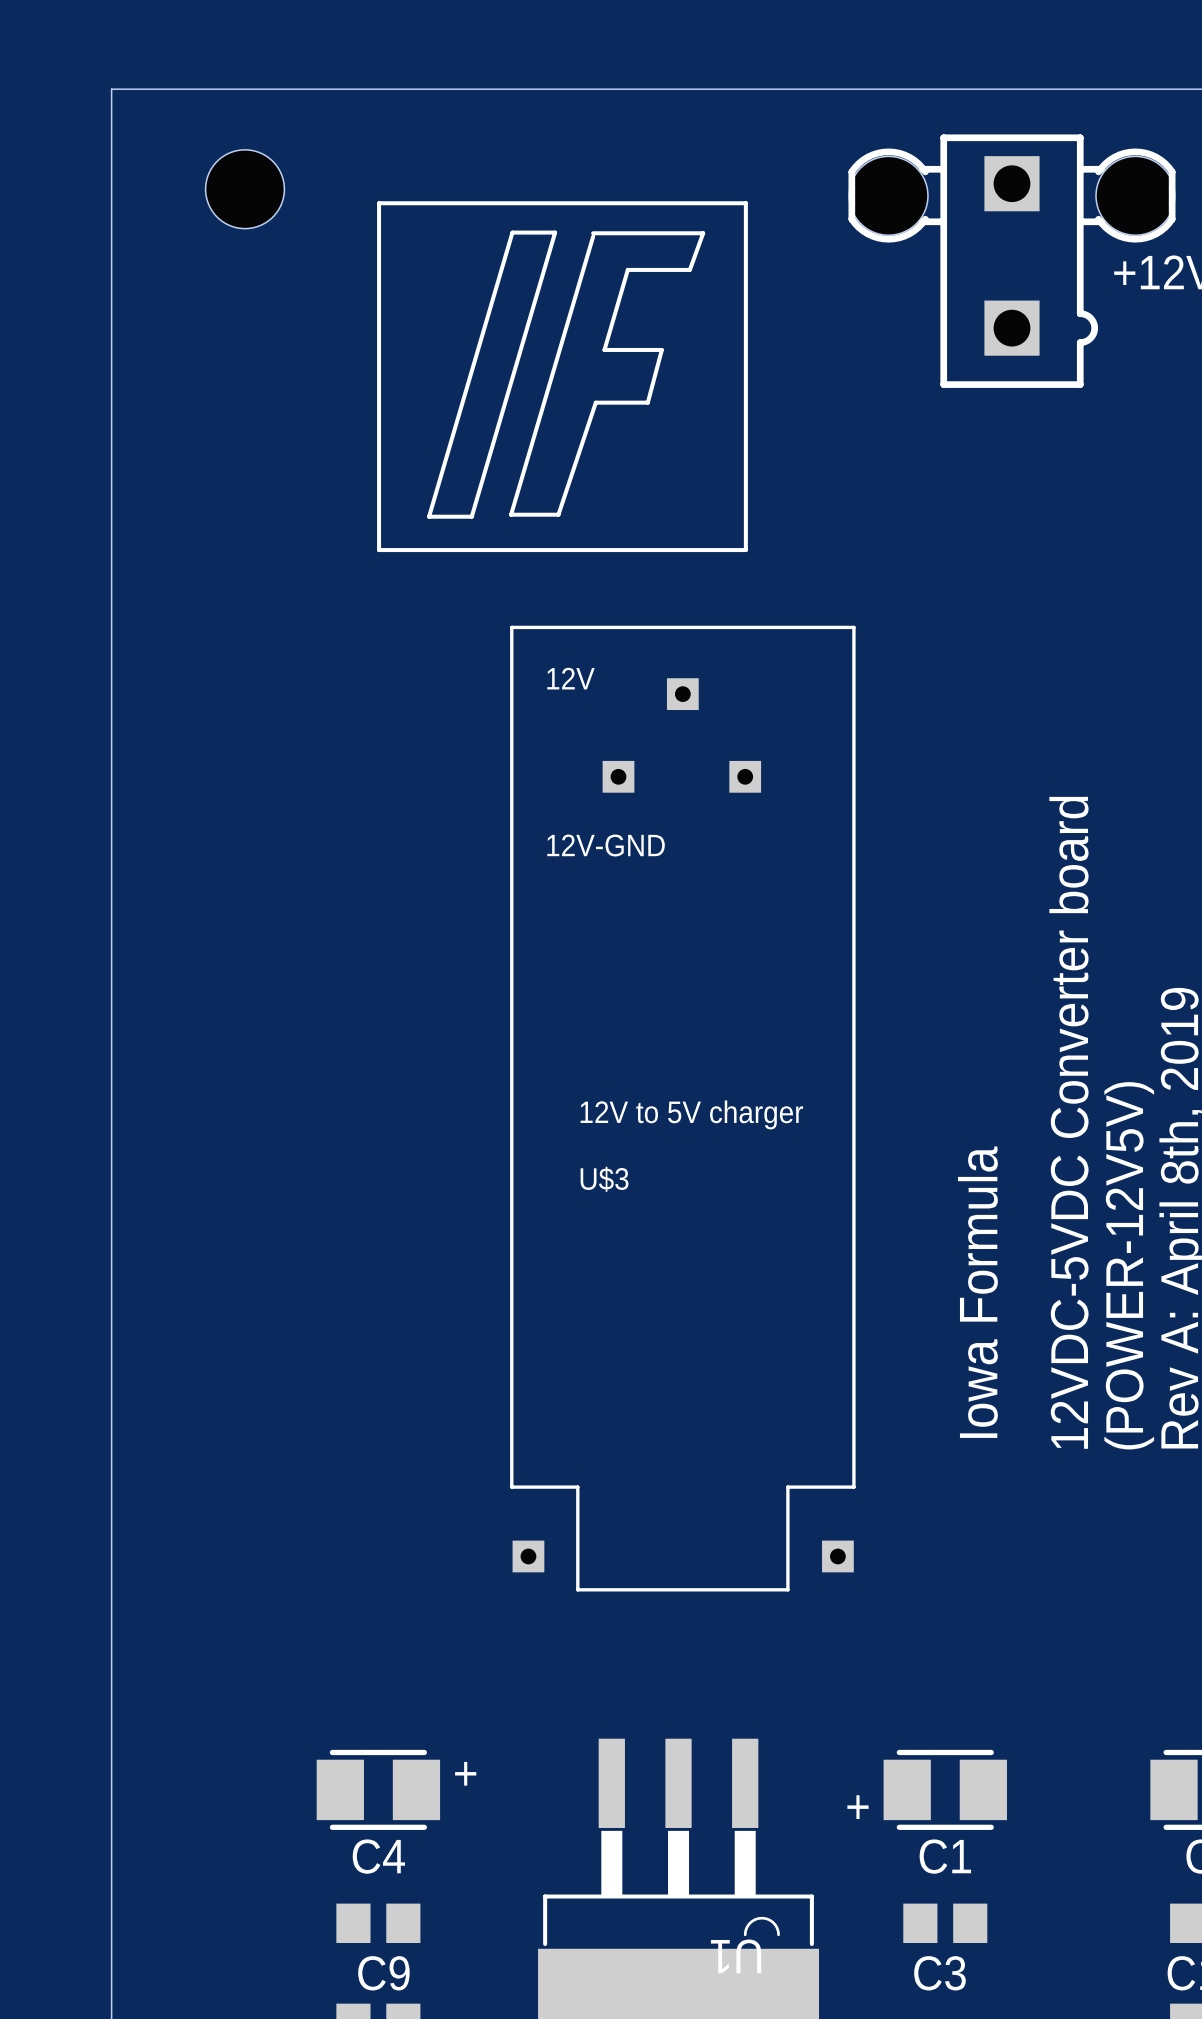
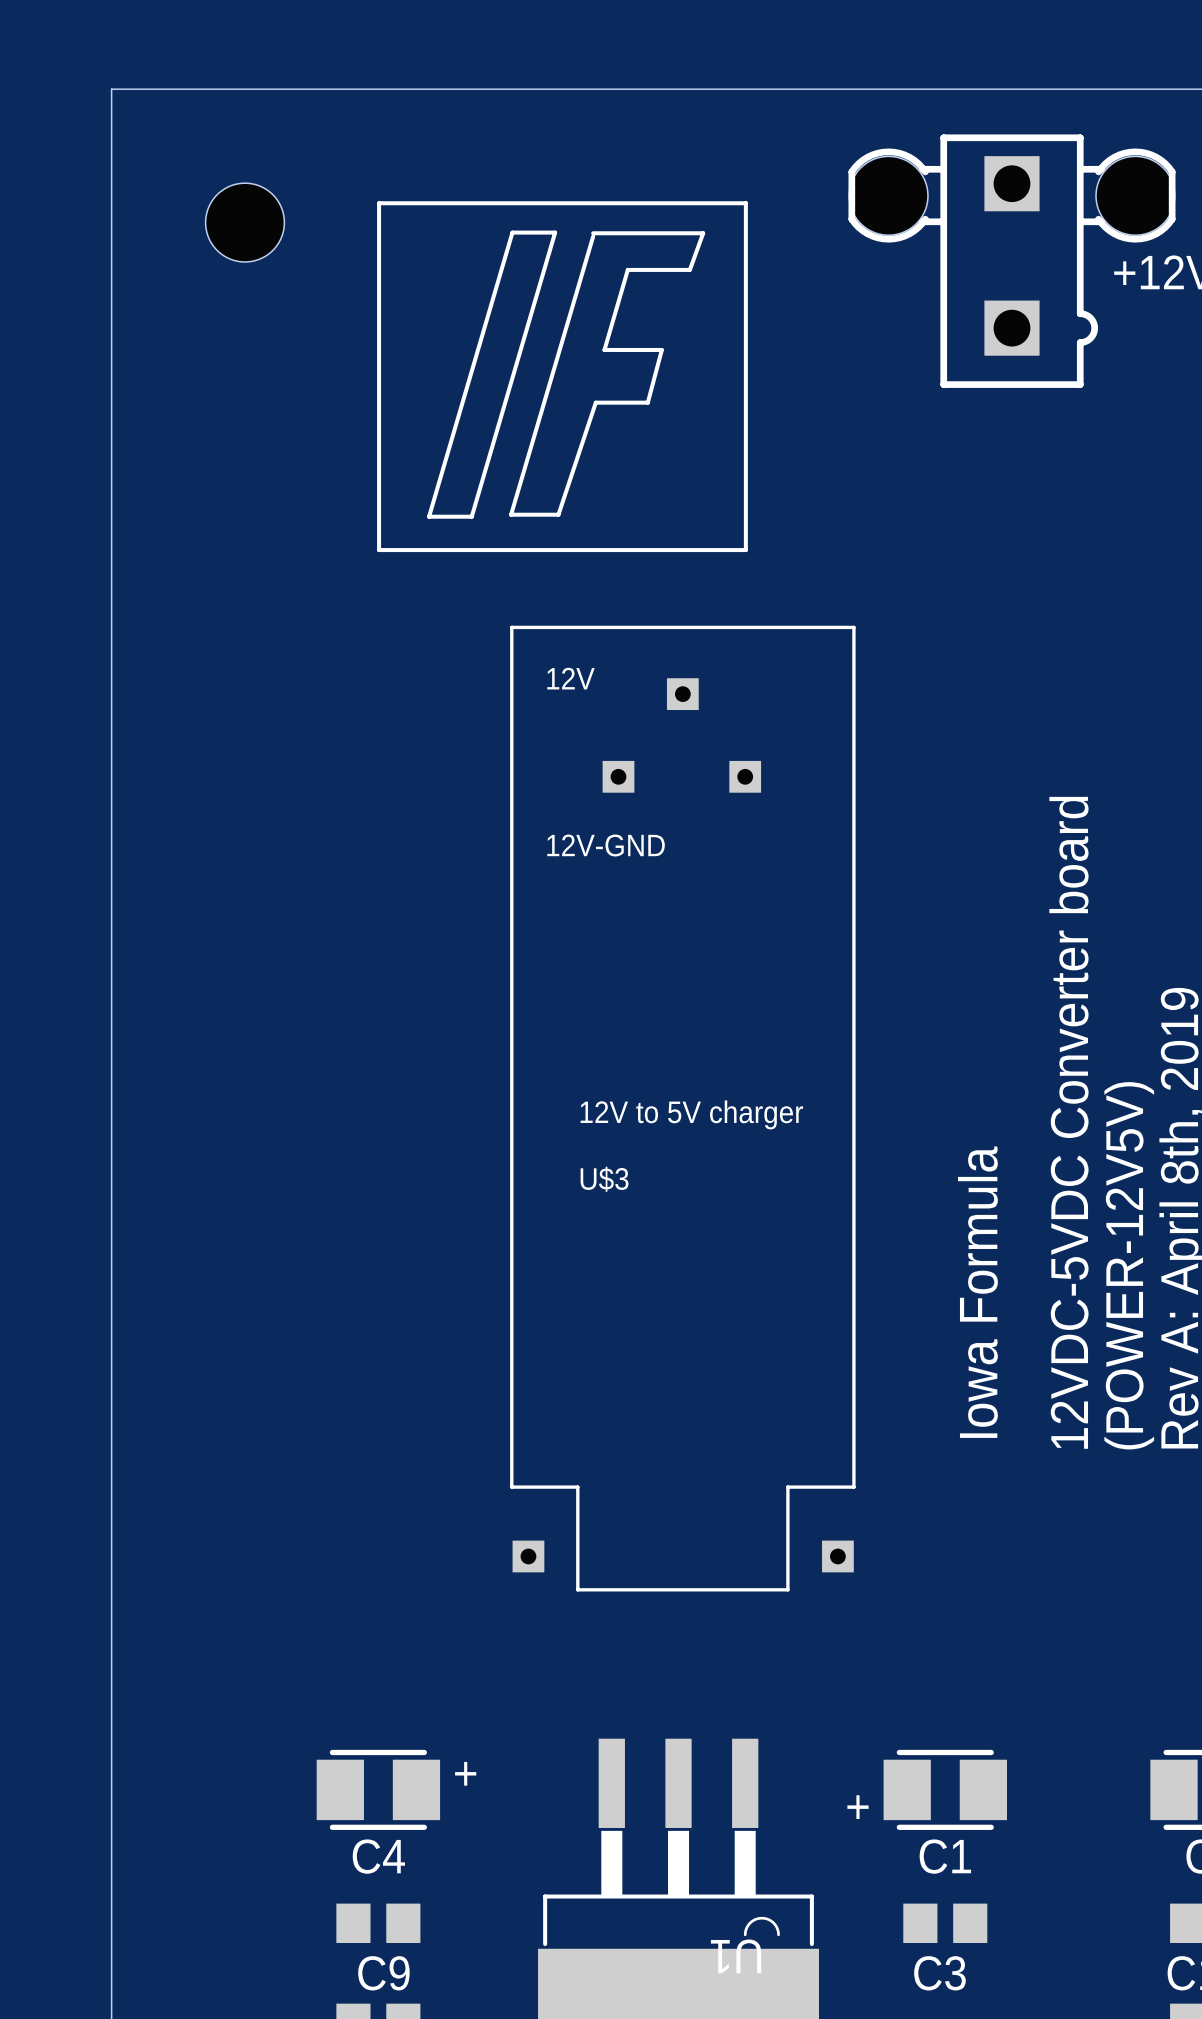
hole position: (245, 189) -> (245, 222)

